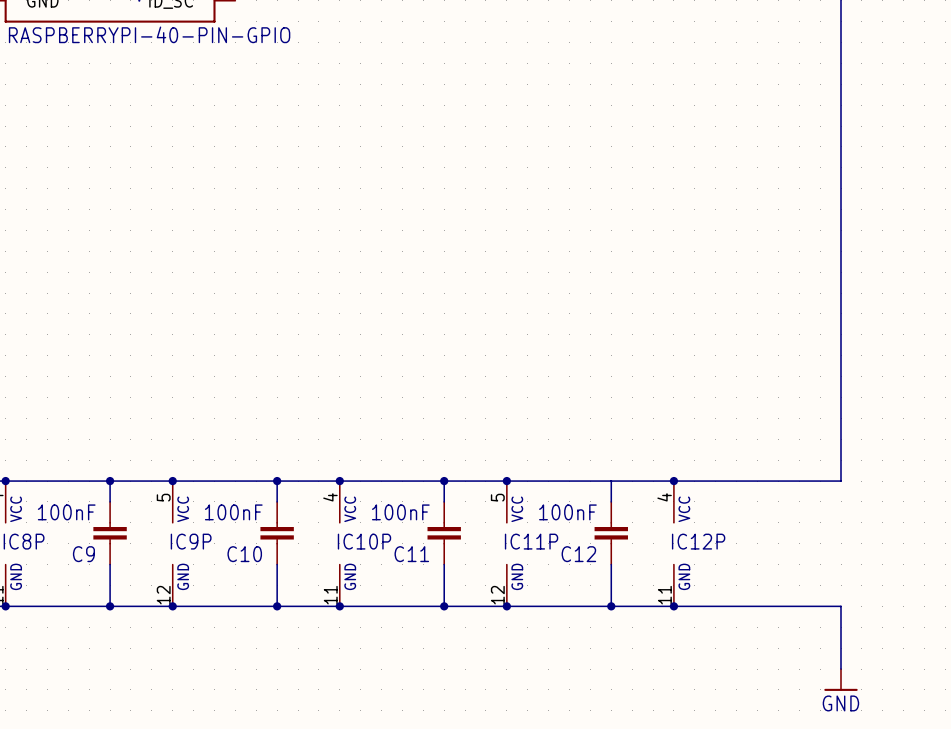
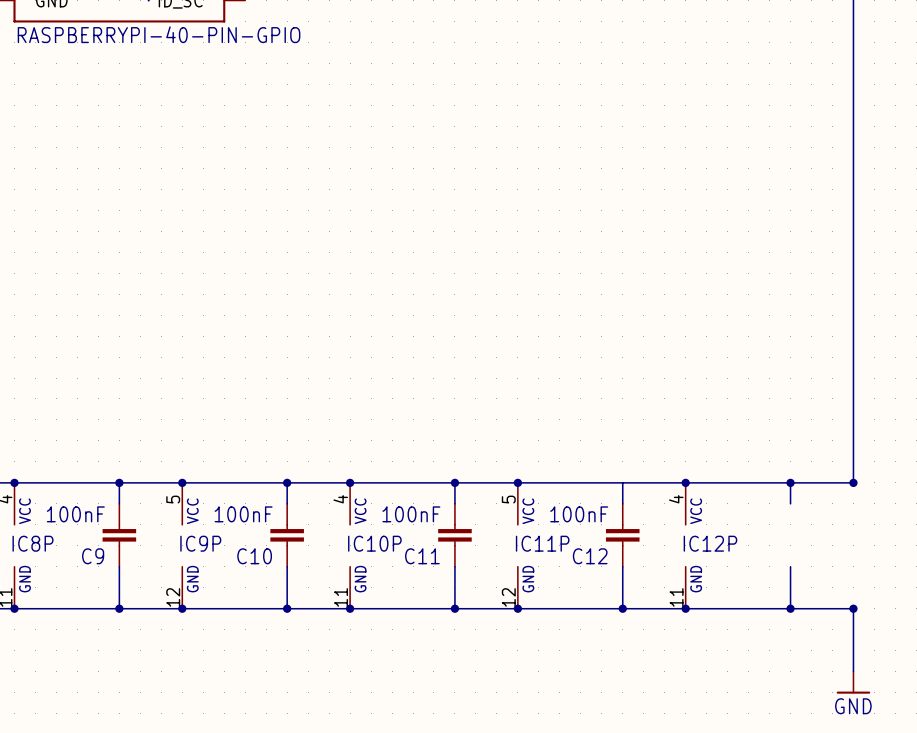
wire: none -> (790, 482) (790, 503)
junction: none -> (790, 482)
junction: none -> (853, 482)
wire: none -> (790, 566) (790, 608)
junction: none -> (790, 608)
junction: none -> (853, 608)

